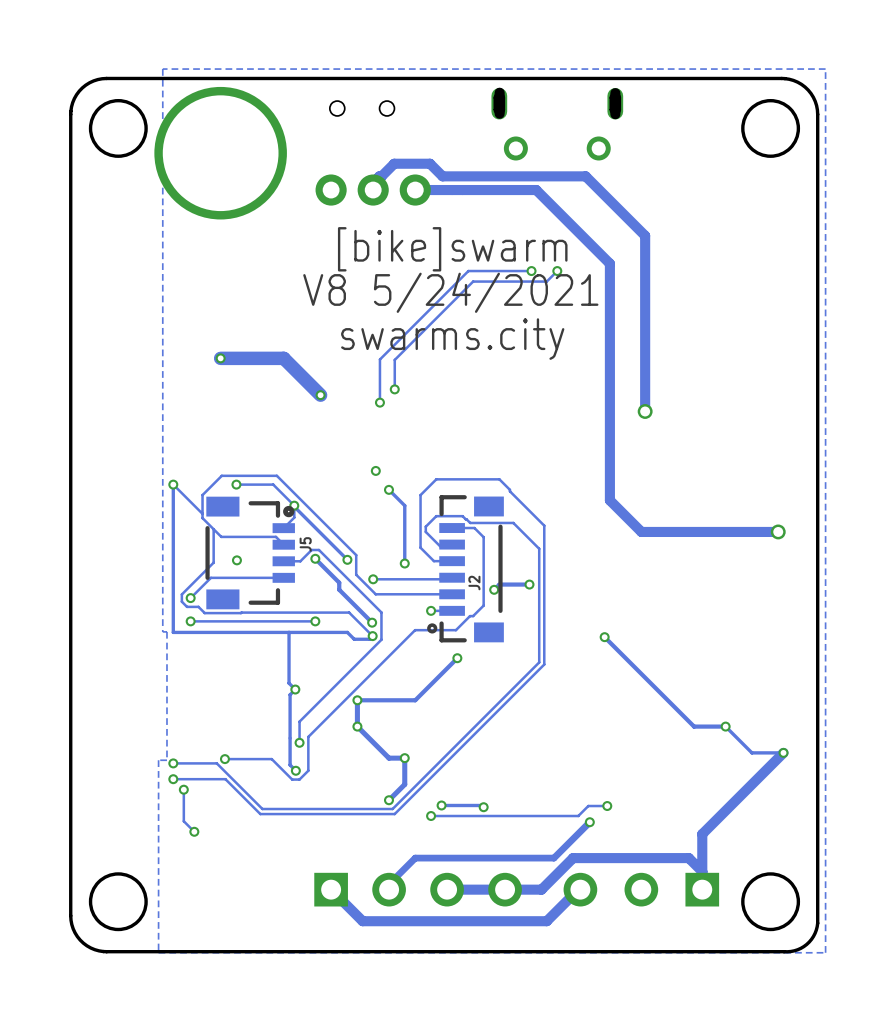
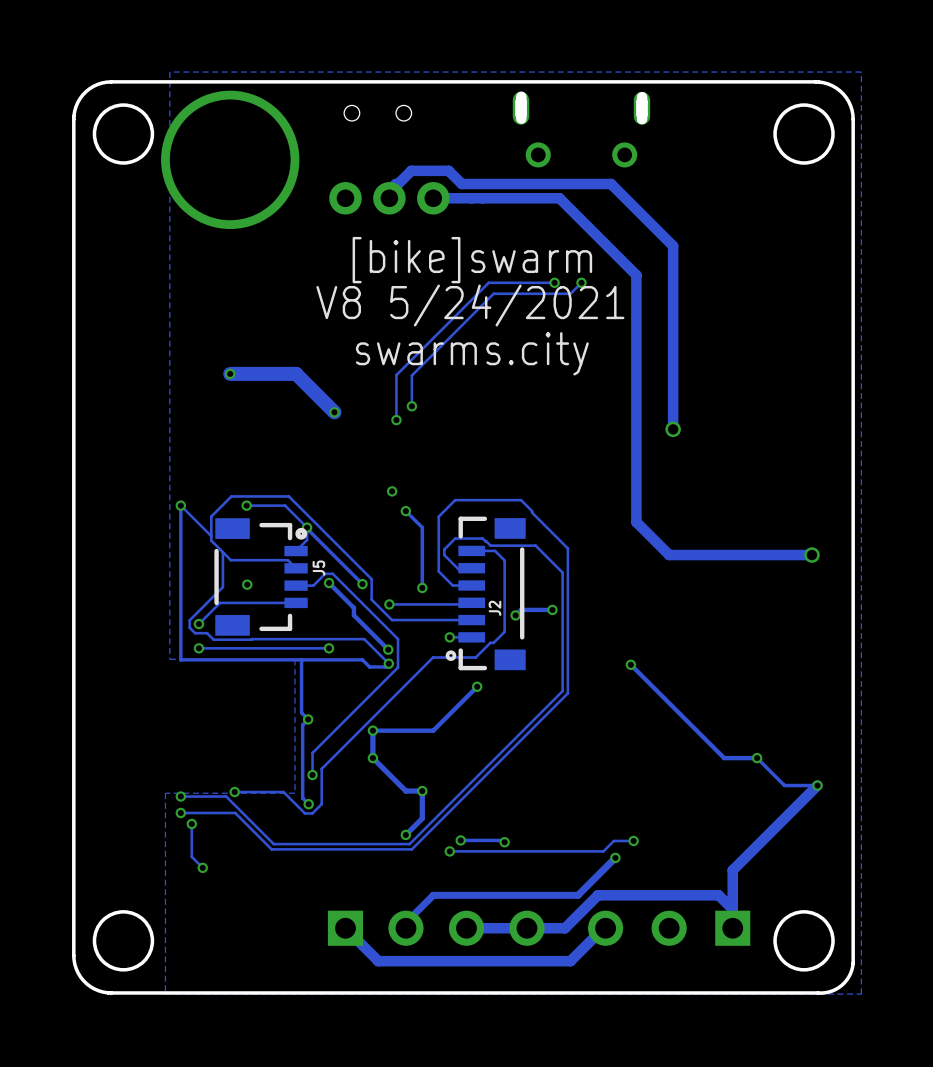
zone outline: (166, 631) (166, 760) -> (174, 659) (294, 659) (294, 793) (174, 793)

